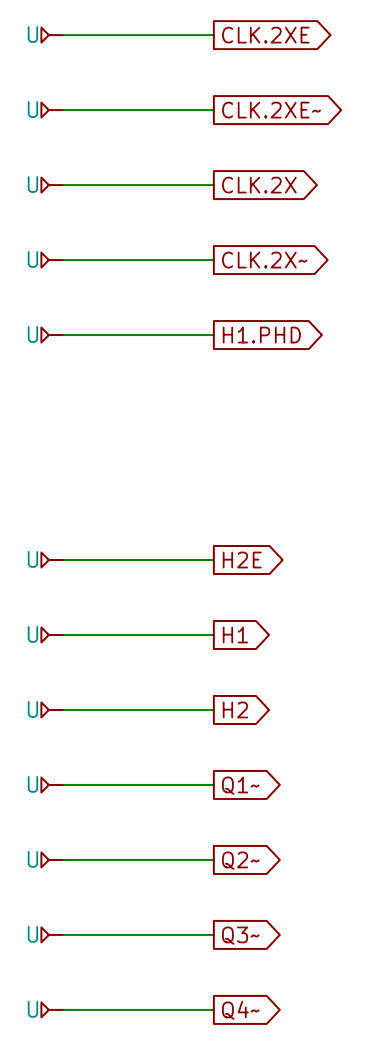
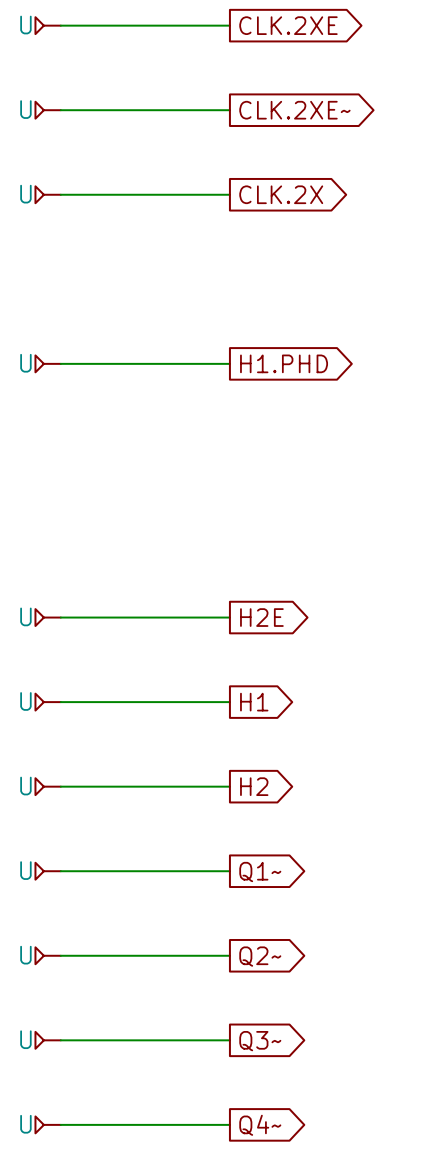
U: (52, 260) -> none
wire: (63, 260) (213, 260) -> none
global label: CLK.2X~ (264, 260) -> none

